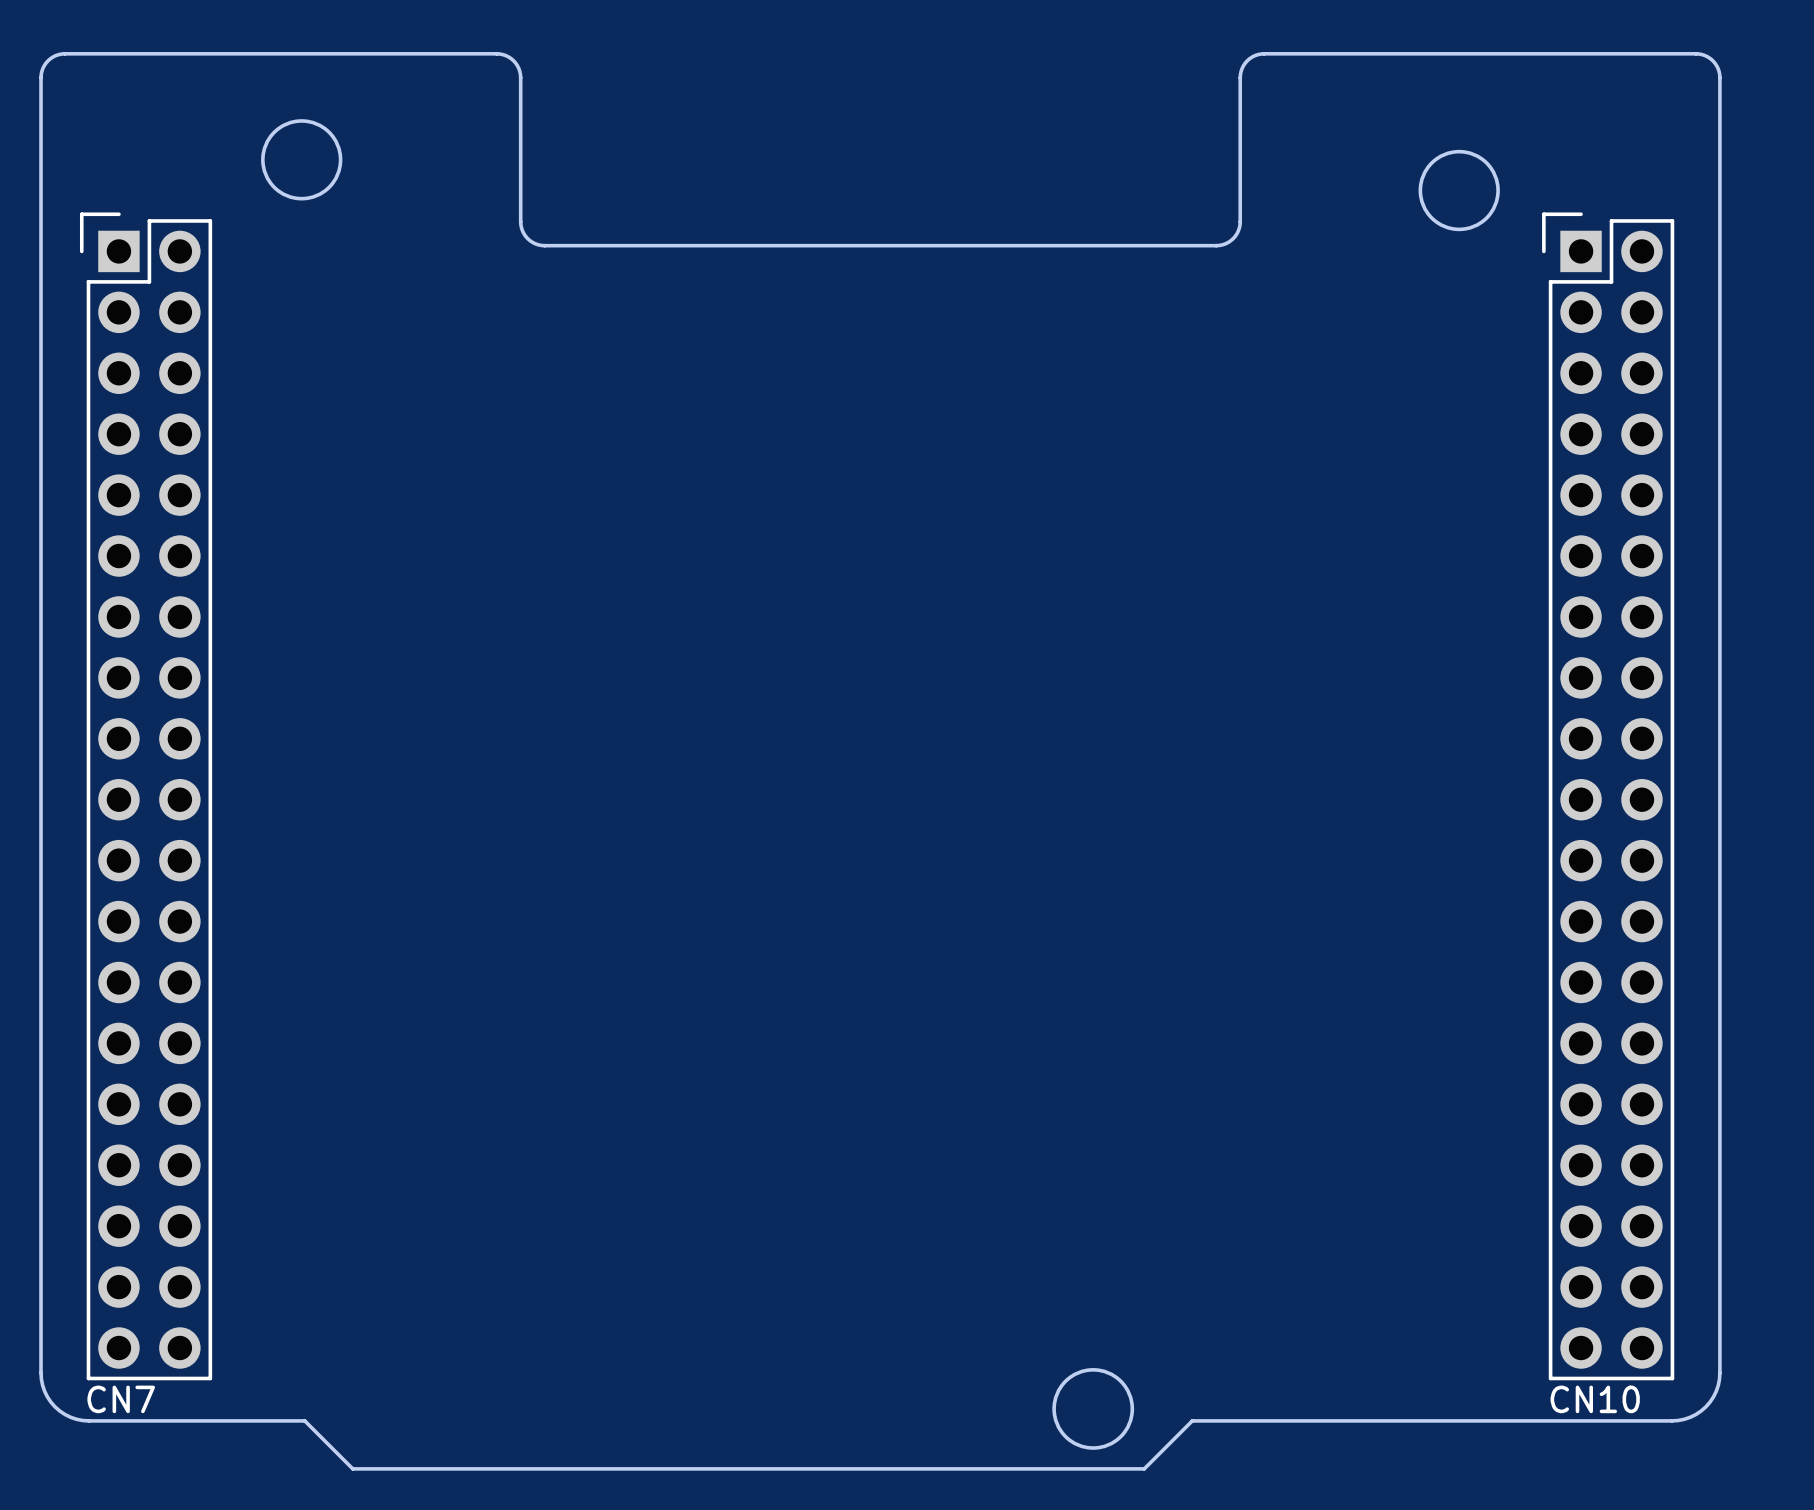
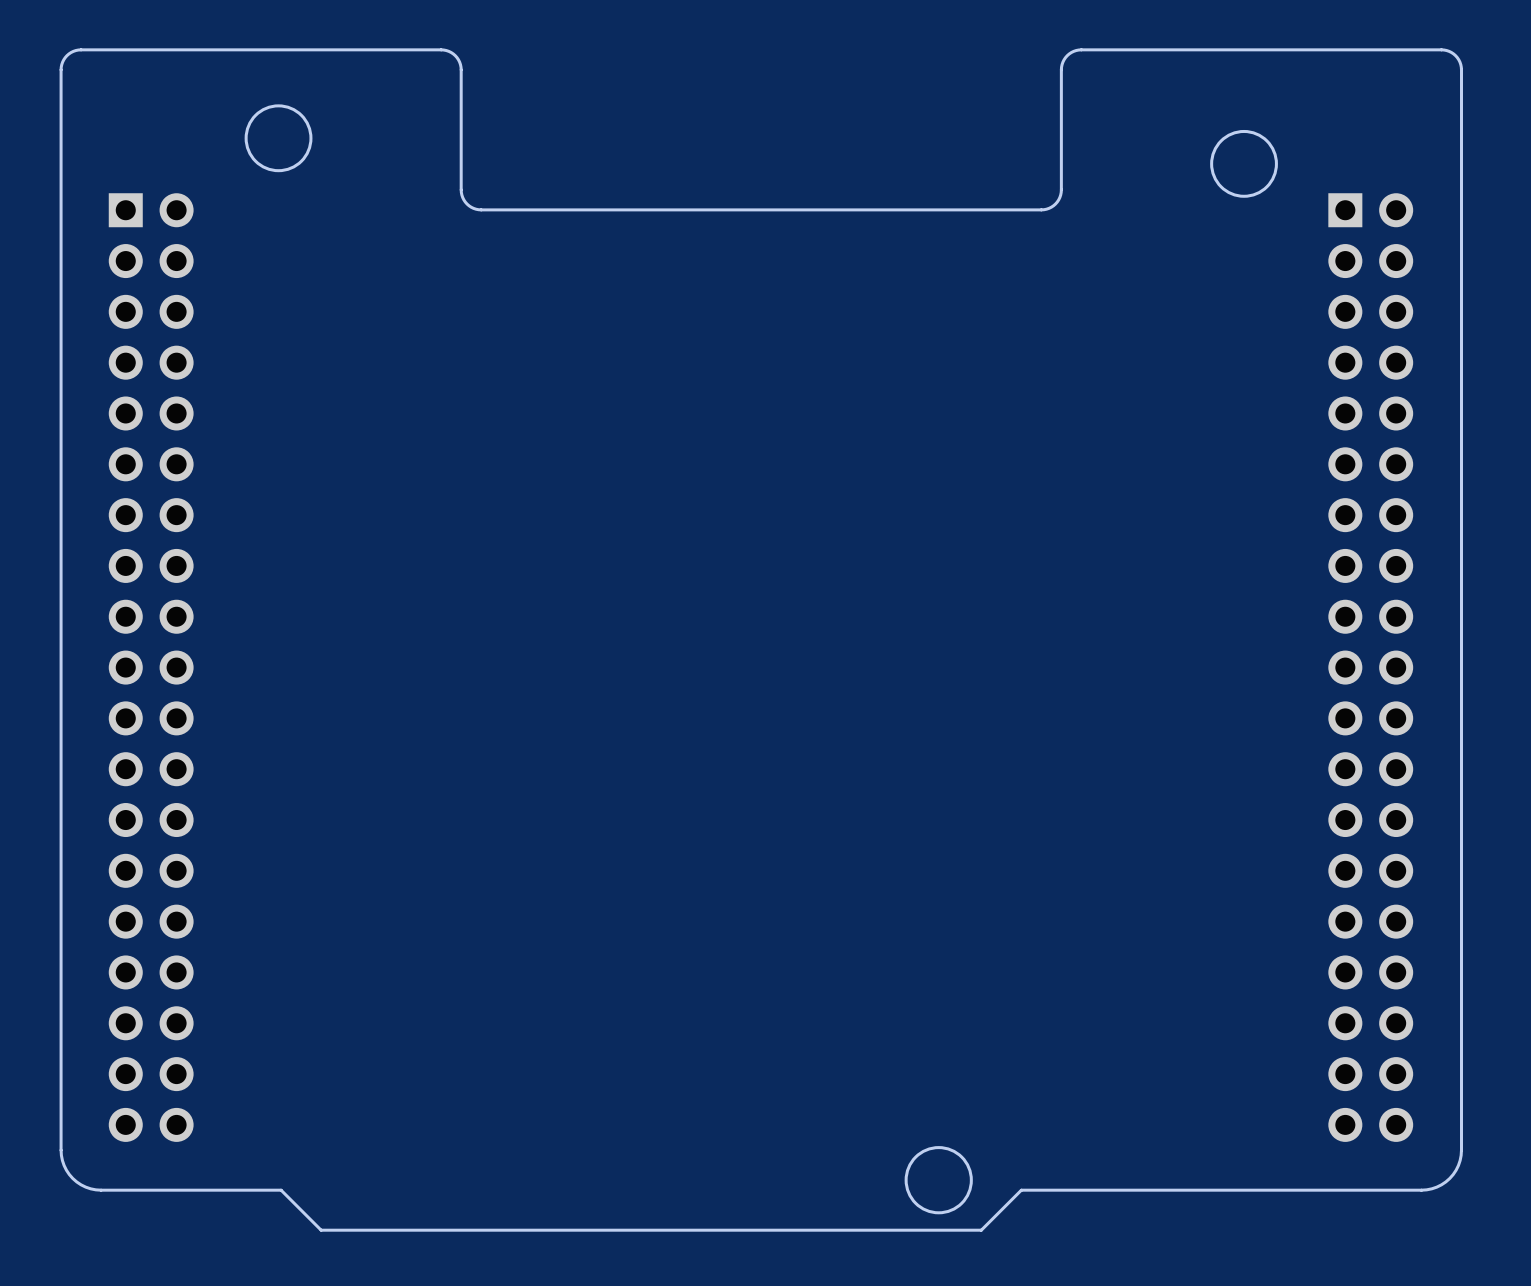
part: none -> (151, 667)
part: none -> (1370, 667)
CN7: (146, 796) -> none
CN10: (1608, 796) -> none

